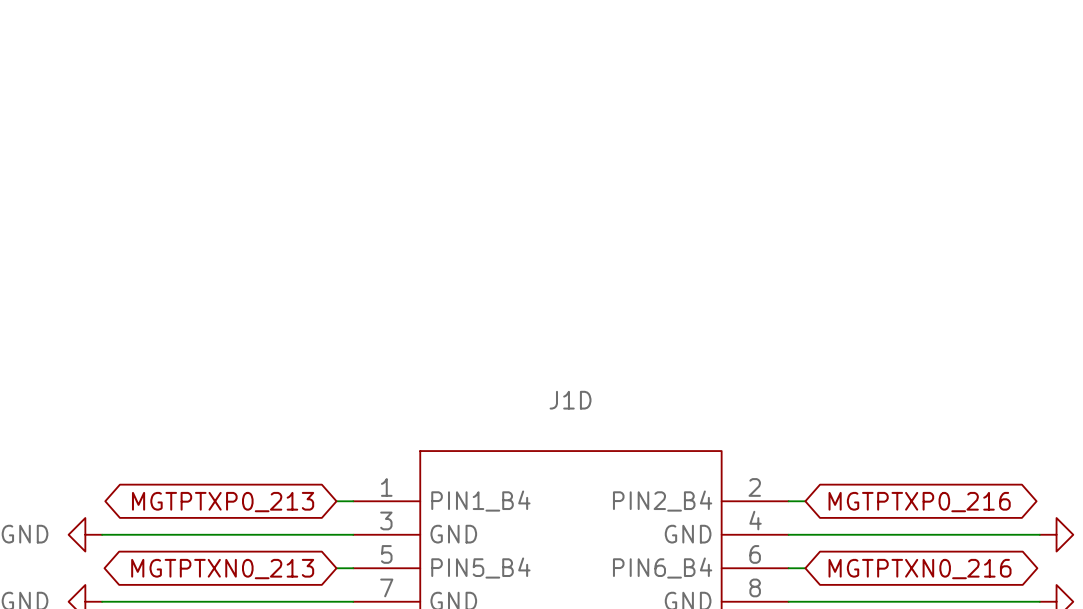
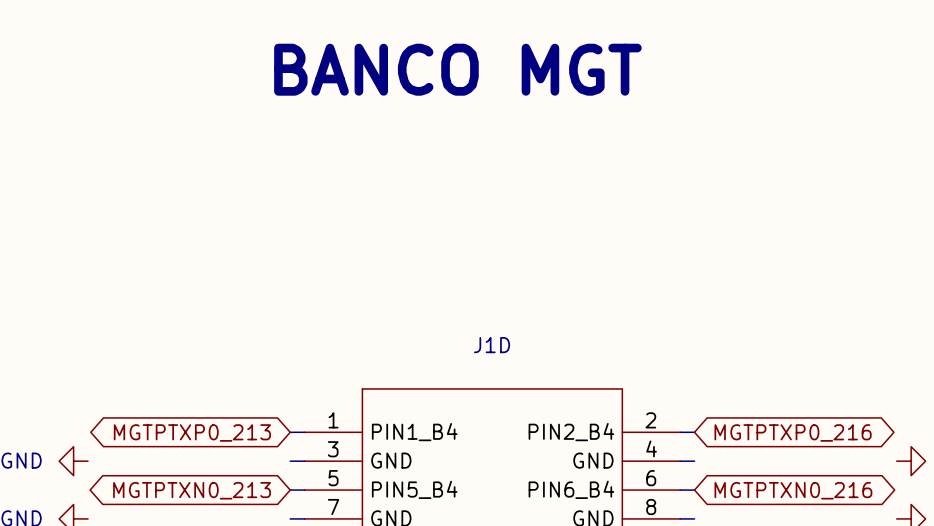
text: none -> BANCO MGT (457, 69)
wire: (102, 534) (336, 534) -> none
wire: (805, 534) (1039, 534) -> none
wire: (102, 601) (336, 601) -> none
wire: (805, 601) (1039, 601) -> none

